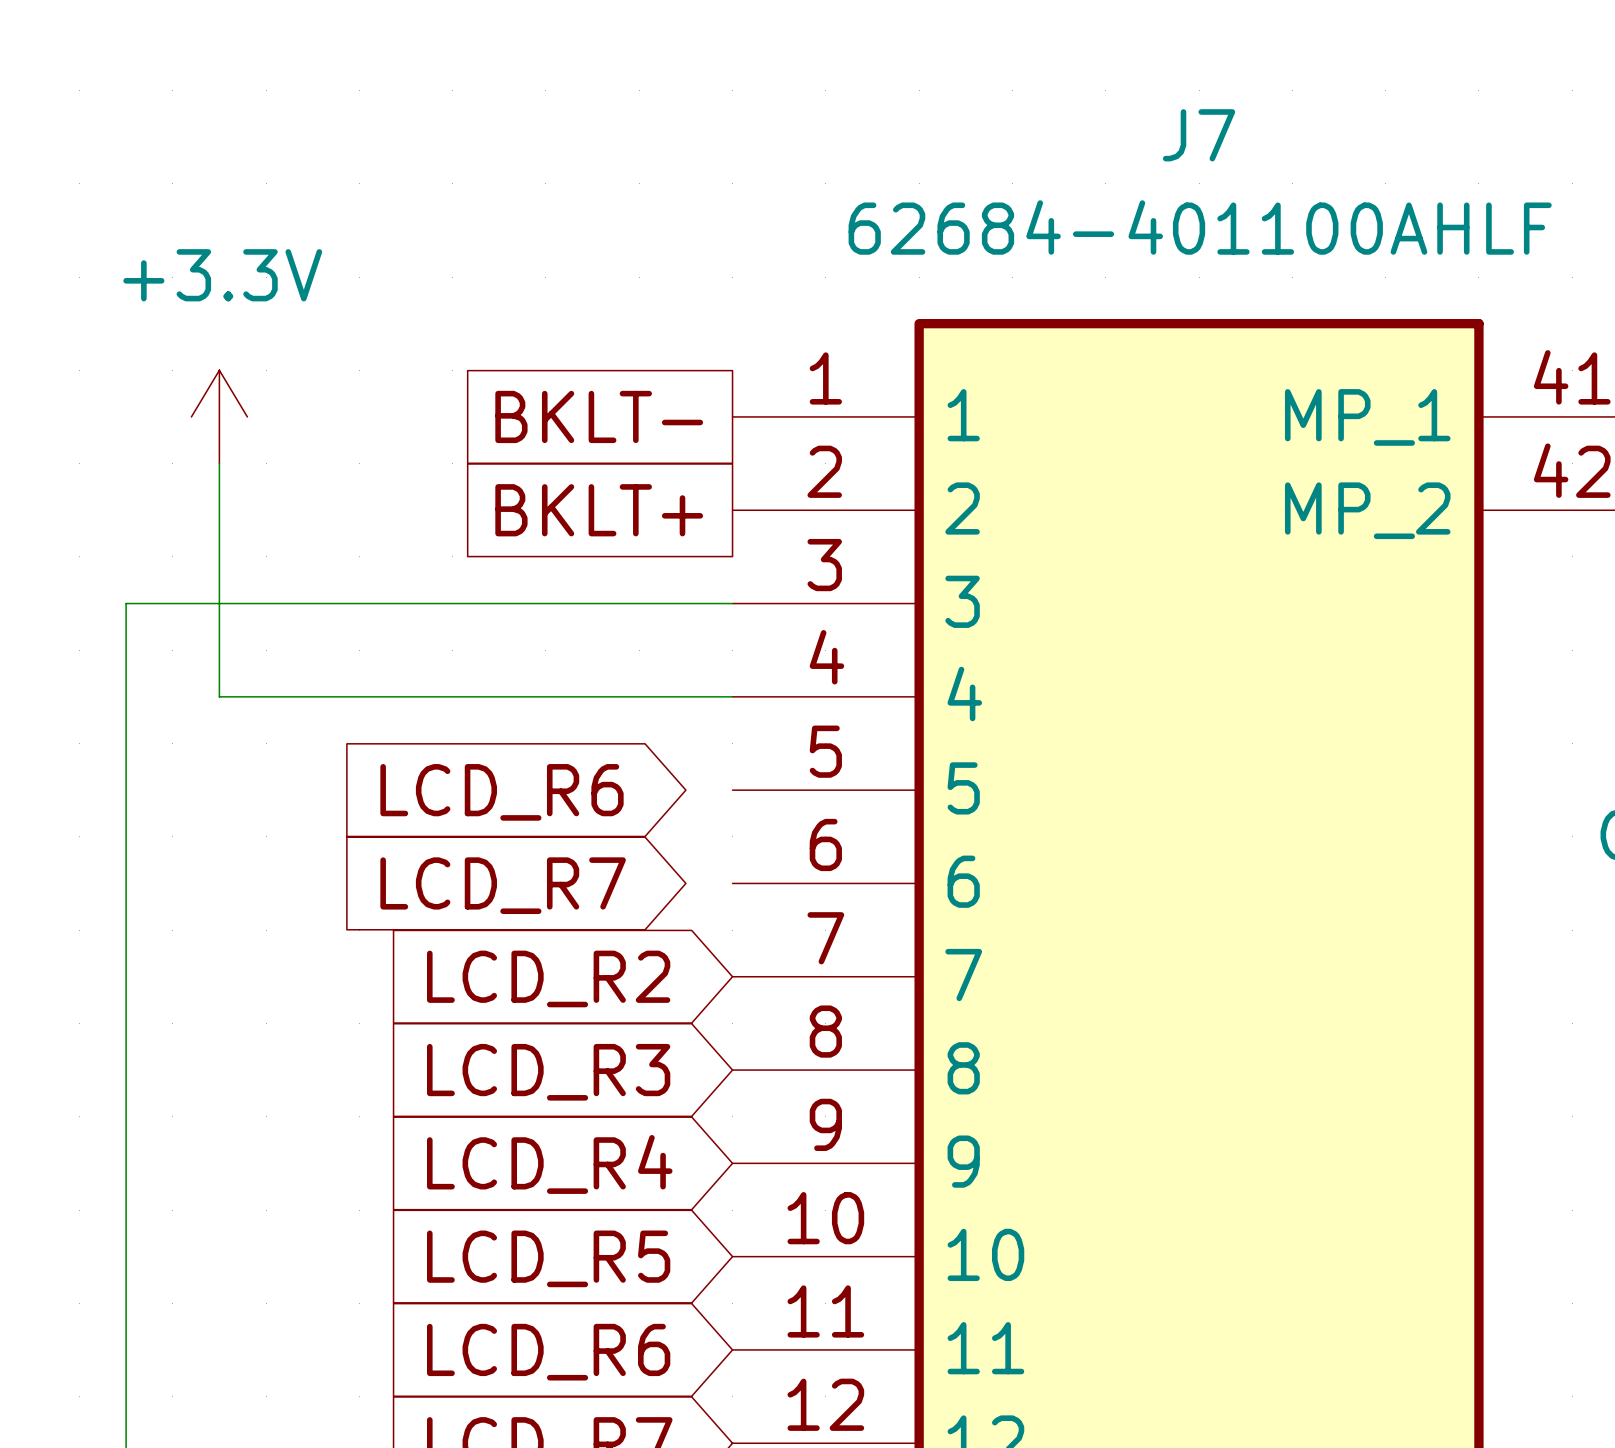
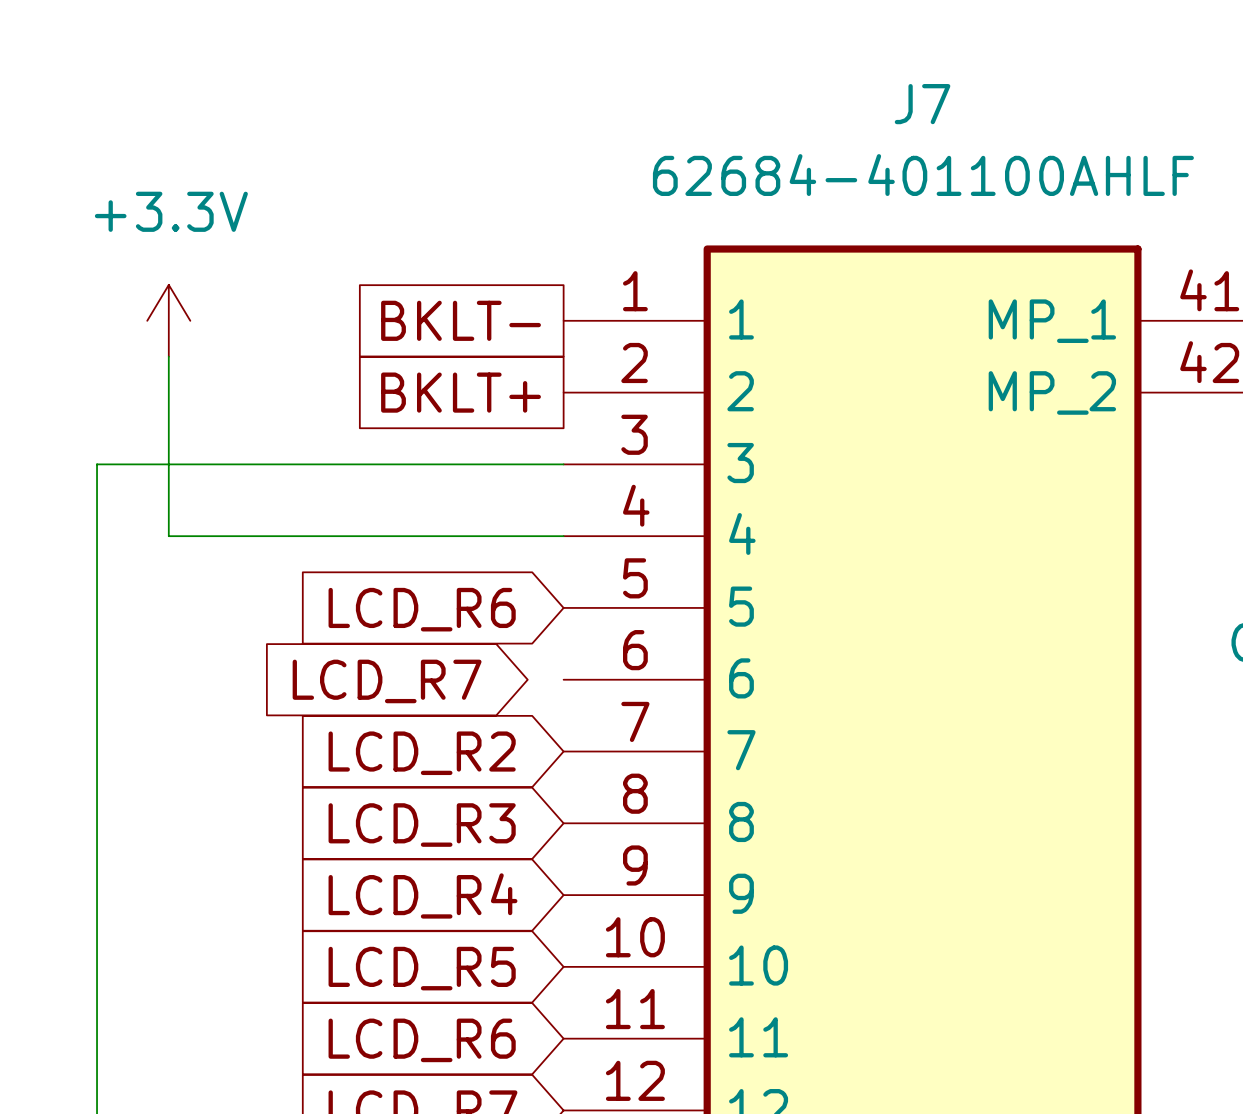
global label position: LCD_R6 (501, 792) -> LCD_R6 (422, 609)

